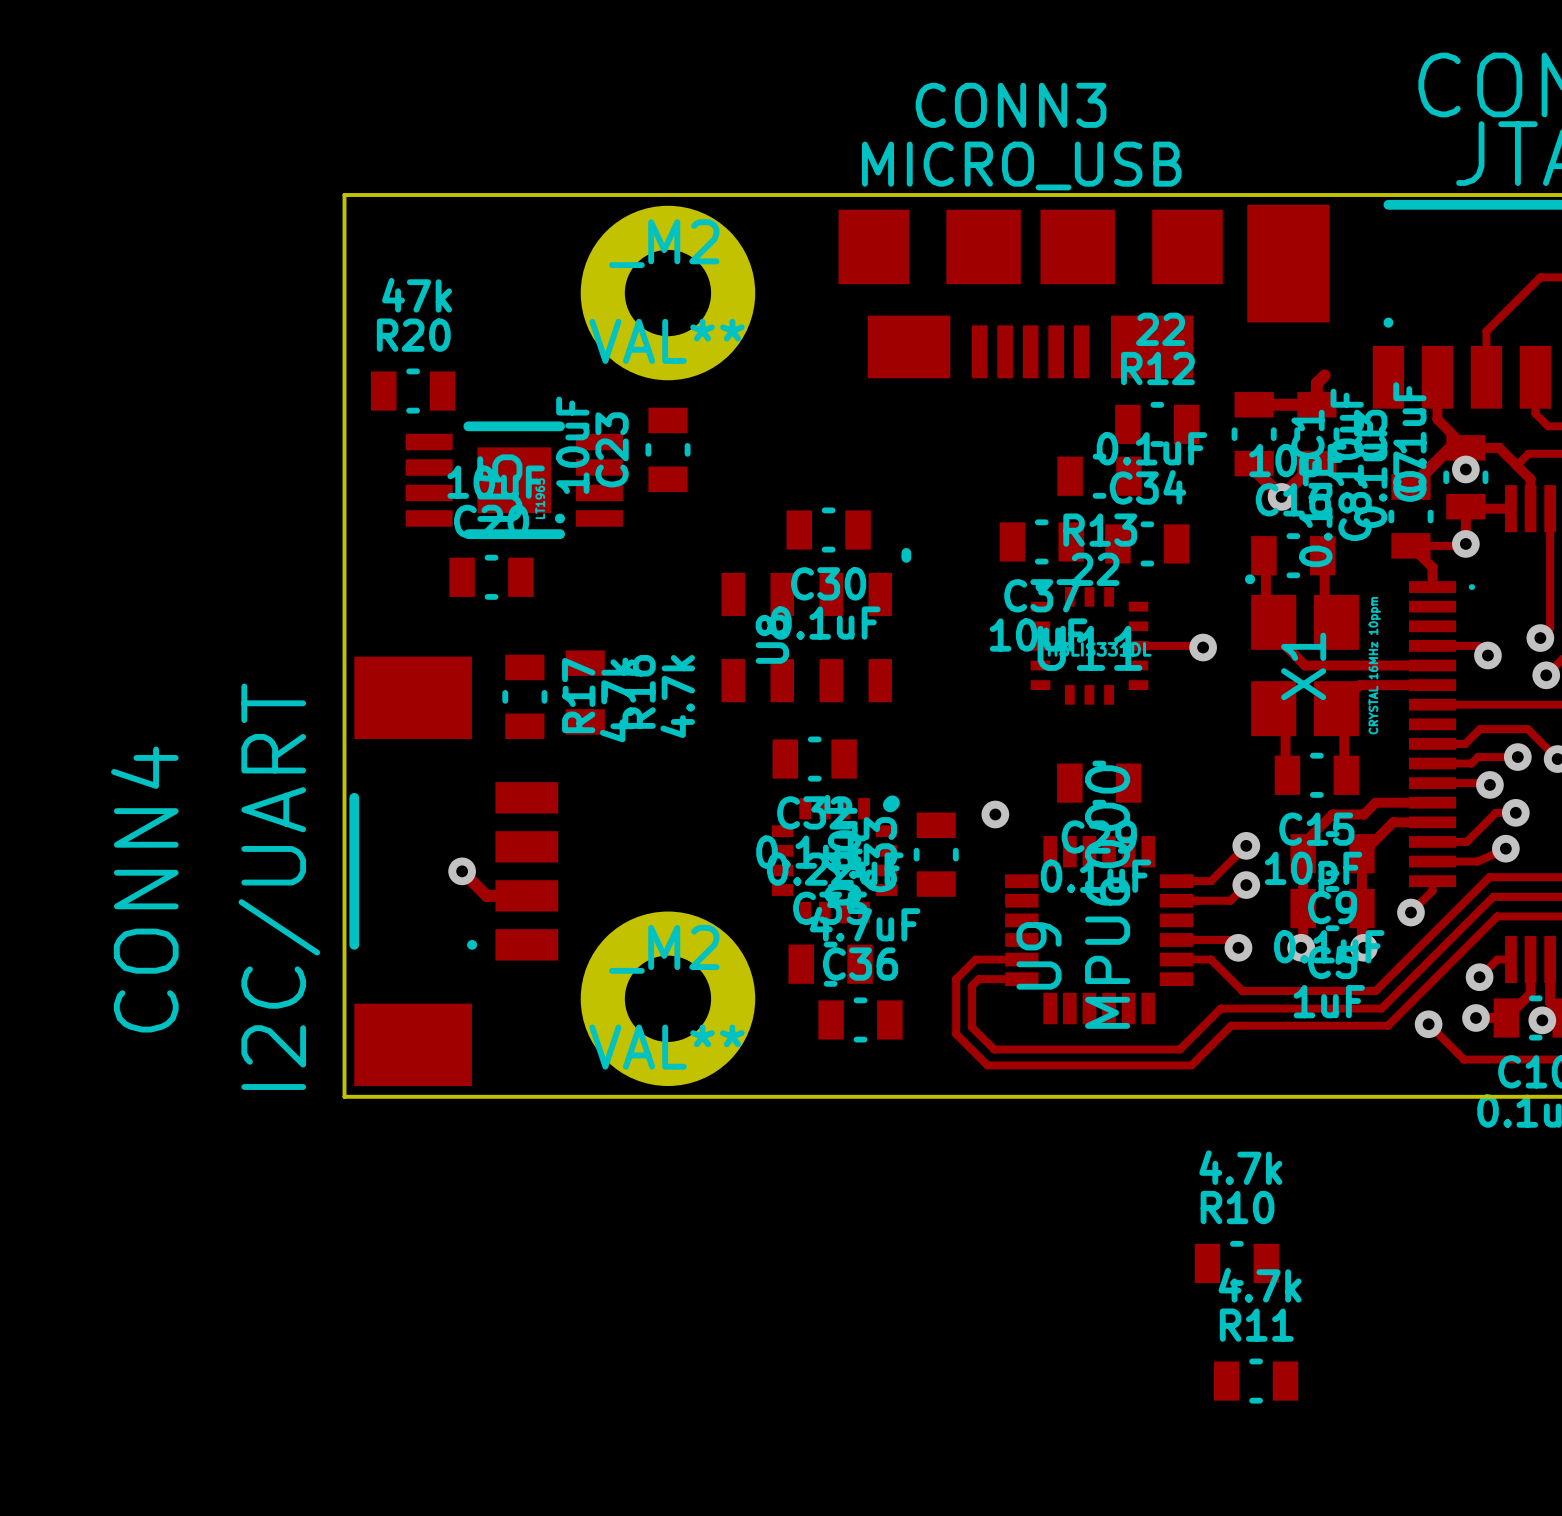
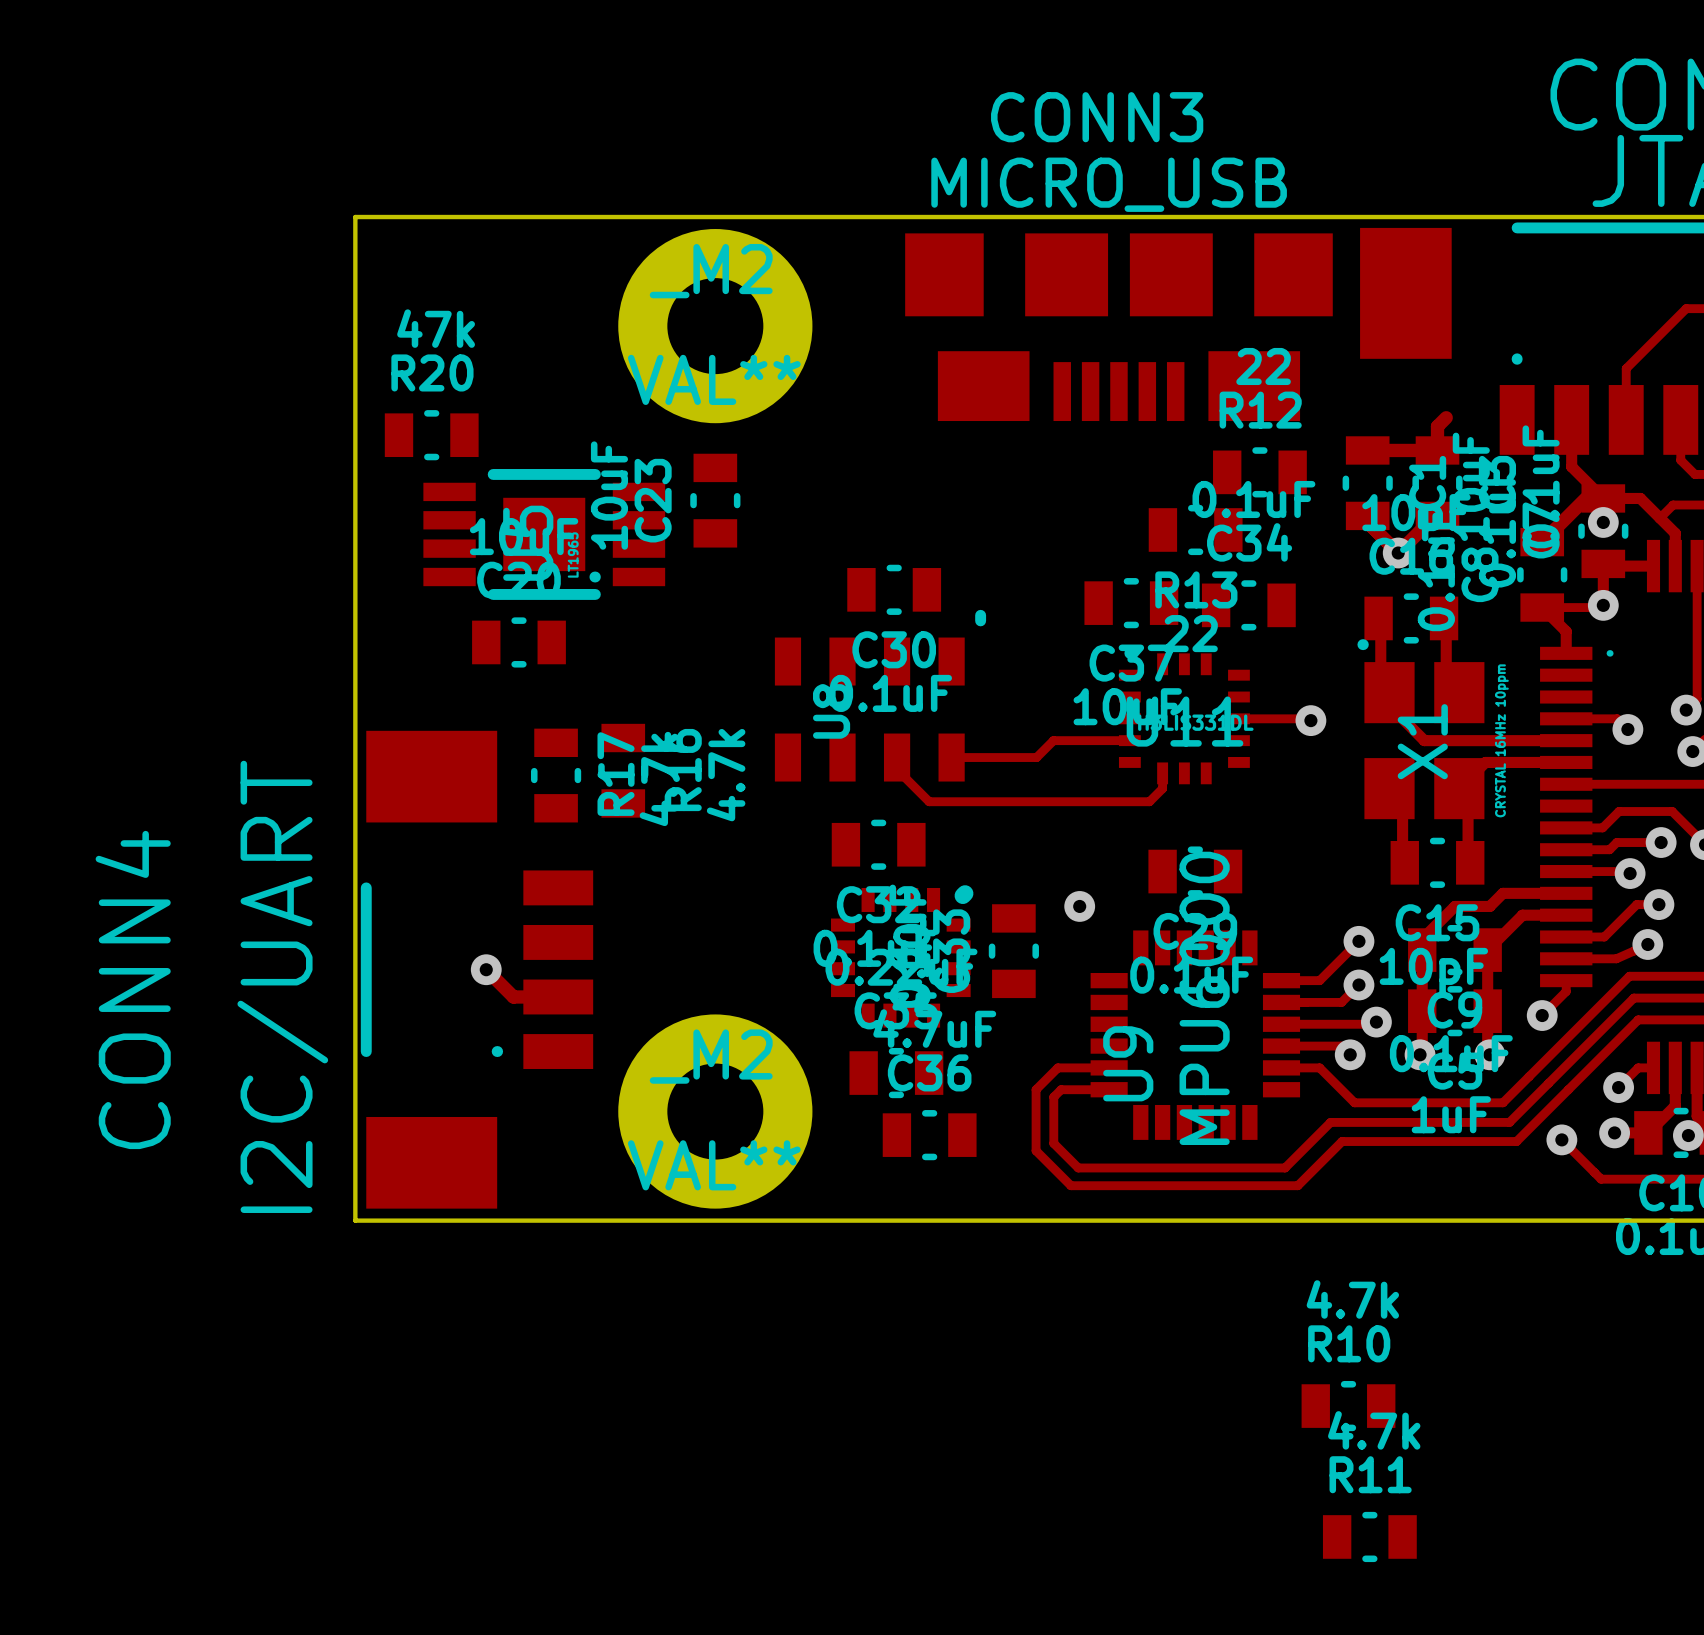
track: none -> (1129, 740) (1053, 740) (1036, 757) (951, 757)
track: none -> (897, 757) (897, 769) (929, 801) (1149, 801) (1162, 788) (1162, 773)
track: none -> (1376, 1022) (1374, 1024) (1281, 1024)
via: none -> (1376, 1022)

